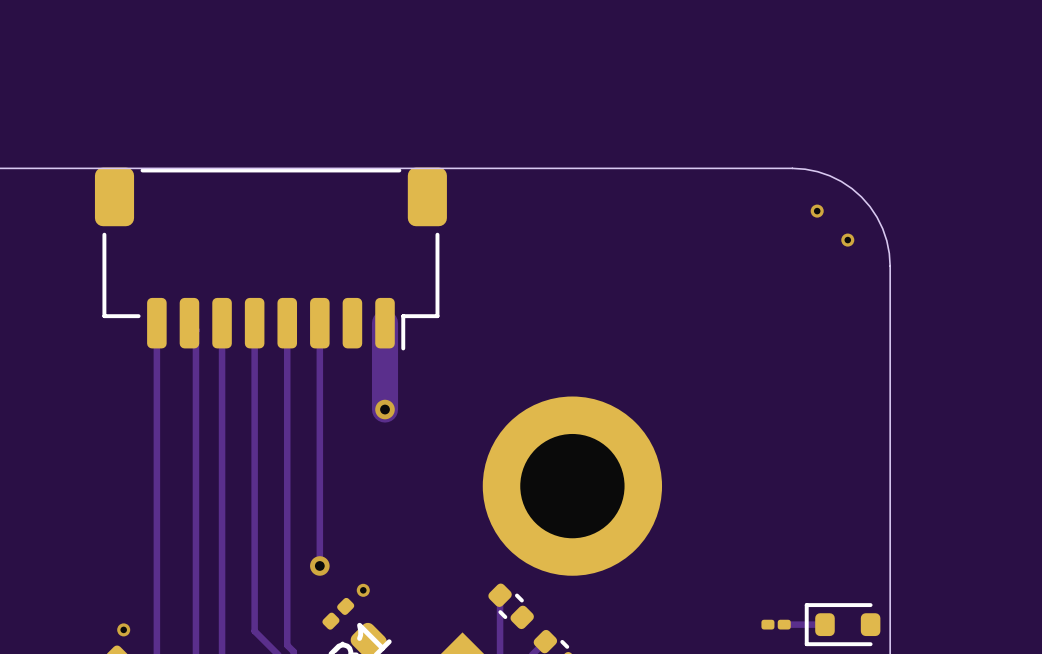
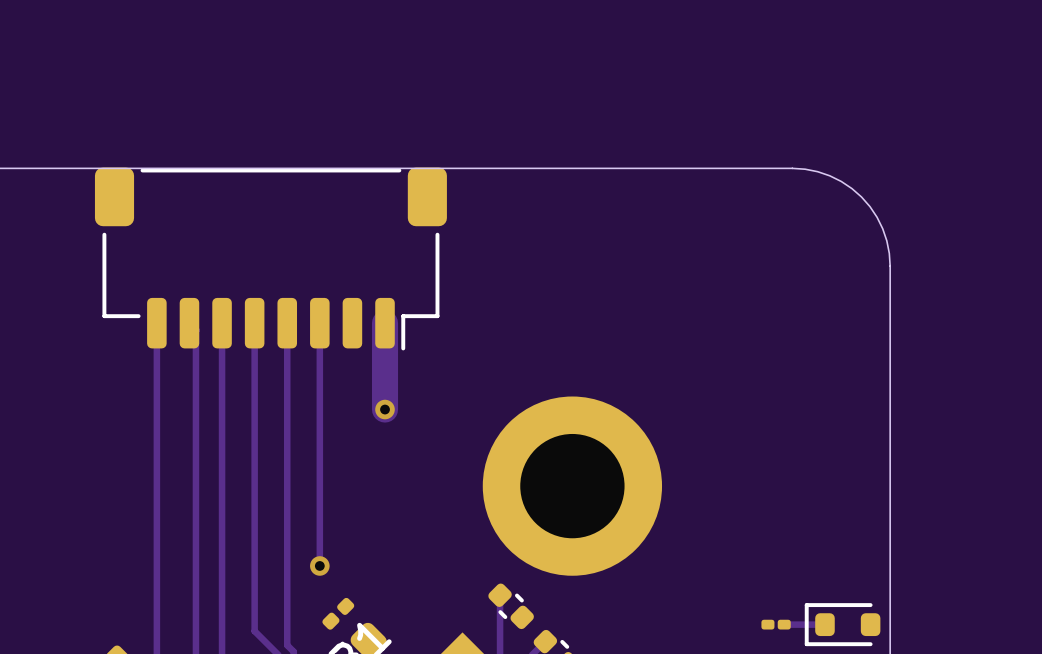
via: (817, 211) -> none
via: (847, 240) -> none
via: (363, 590) -> none
via: (123, 629) -> none

